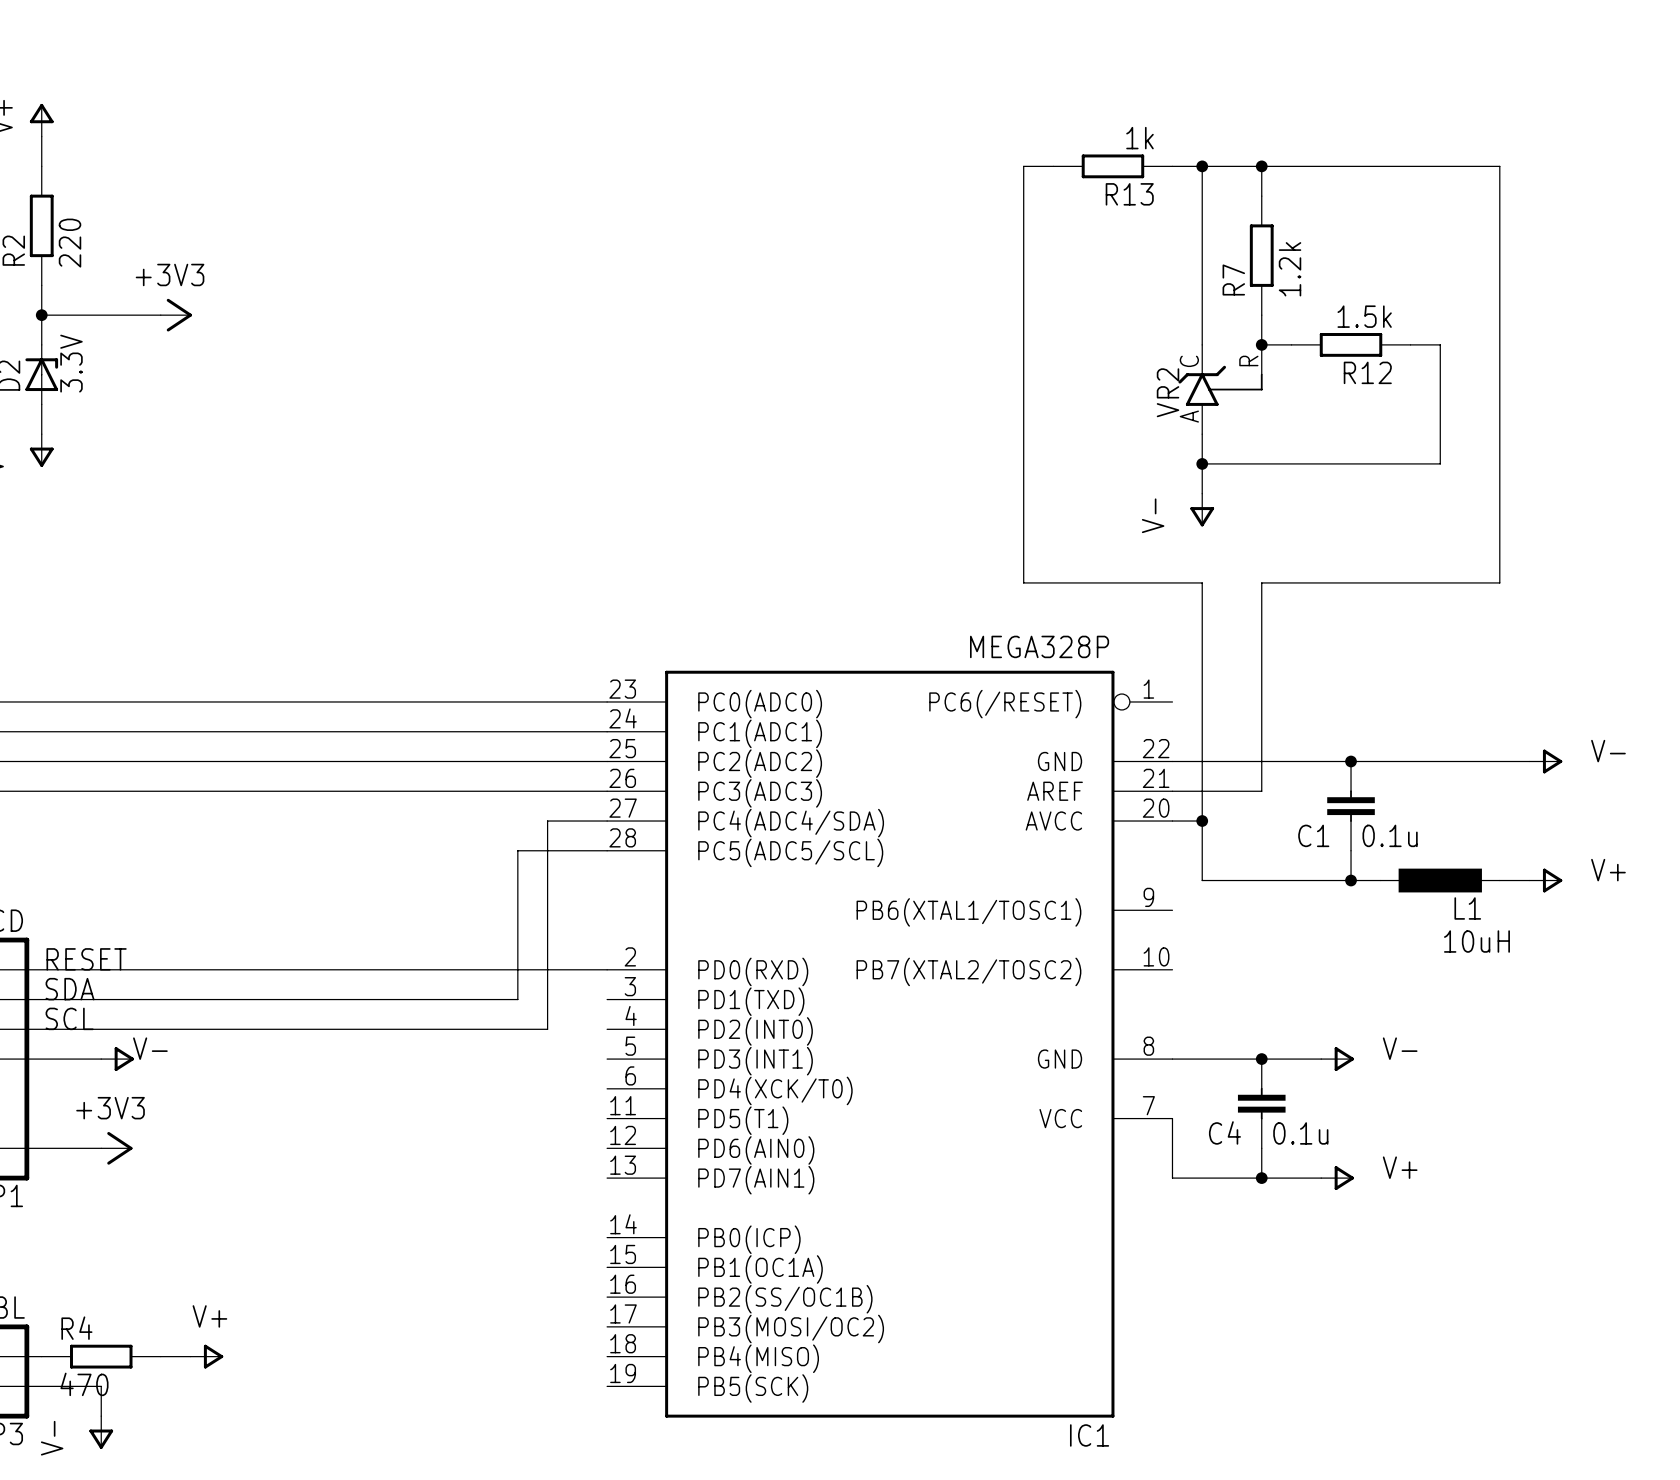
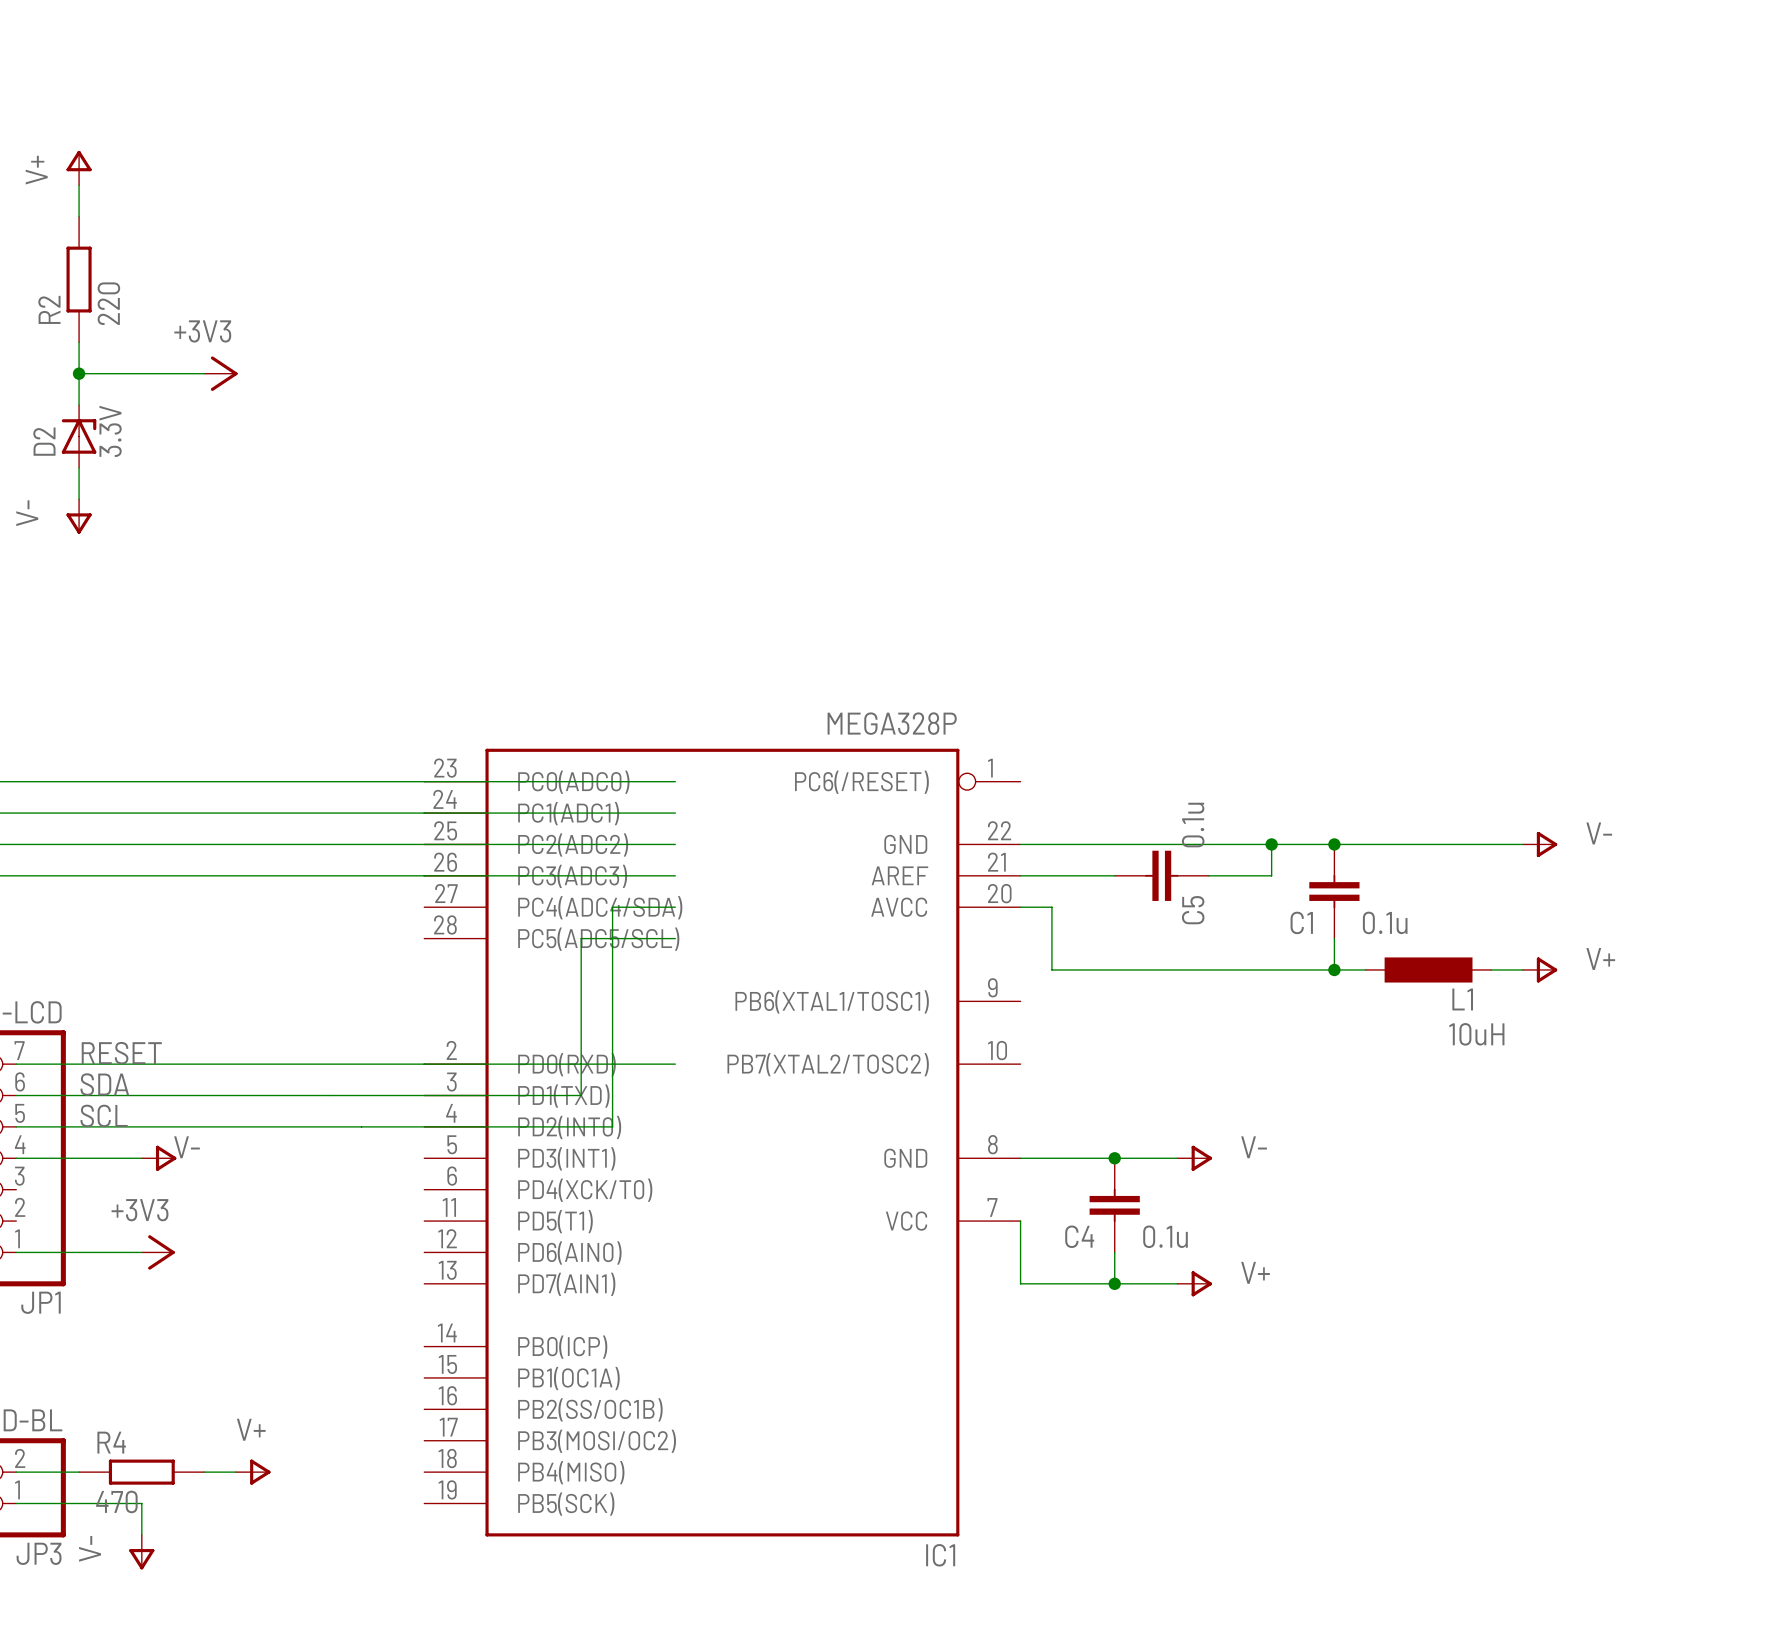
wire: (1053, 166) (1023, 166) (1023, 582) (1202, 582) (1202, 880) -> (1020, 907) (1051, 907) (1051, 969) (1303, 969)
R13: 1k (1112, 166) -> none
wire: (1172, 166) (1499, 166) (1499, 582) (1261, 582) (1261, 791) (1172, 791) -> none
wire: (1202, 166) (1202, 344) -> none
junction: (1202, 166) -> none
wire: (1261, 166) (1261, 196) -> none
junction: (1261, 166) -> none
R7: 1.2k (1261, 255) -> none
wire: (1261, 315) (1261, 344) (1291, 344) -> none
junction: (1261, 344) -> none
R12: 1.5k (1351, 344) -> none
wire: (1410, 344) (1440, 344) (1440, 463) (1202, 463) -> none
VR2: (1220, 389) -> none
wire: (1202, 434) (1202, 493) -> none
junction: (1202, 463) -> none
power symbol: V- (1202, 510) -> none
wire: none -> (1020, 844) (1271, 844) (1271, 875) (1208, 875)
junction: none -> (1271, 844)
junction: none -> (1334, 844)
junction: (1351, 761) -> none
wire: (1410, 761) (1529, 761) -> none
power symbol position: V- (1545, 761) -> V- (1539, 844)
wire: none -> (1020, 875) (1114, 875)
C5: none -> 0.1u (1161, 875)
C1 position: (1351, 806) -> (1334, 891)
wire: (1172, 821) (1202, 821) -> none
junction: (1202, 821) -> none
wire: (1351, 850) (1351, 880) -> (1334, 938) (1334, 969)
junction: none -> (1334, 969)
junction: (1351, 880) -> none
L1 position: (1440, 880) -> (1428, 969)
wire: (1499, 880) (1529, 880) -> none
power symbol position: V+ (1545, 880) -> V+ (1539, 969)
IC1 position: (889, 1044) -> (722, 1142)
junction: none -> (1114, 1158)
power symbol: none -> V- (1194, 1158)
wire: (1172, 1059) (1321, 1059) -> (1020, 1158) (1177, 1158)
junction: (1261, 1059) -> none
power symbol: V- (1337, 1059) -> none
C4 position: (1261, 1103) -> (1114, 1205)
wire: (1172, 1118) (1172, 1178) (1321, 1178) -> (1020, 1221) (1020, 1283) (1177, 1283)
wire: (1261, 1148) (1261, 1178) -> (1114, 1252) (1114, 1283)
junction: none -> (1114, 1283)
power symbol: none -> V+ (1194, 1283)
junction: (1261, 1178) -> none
power symbol: V+ (1337, 1178) -> none

